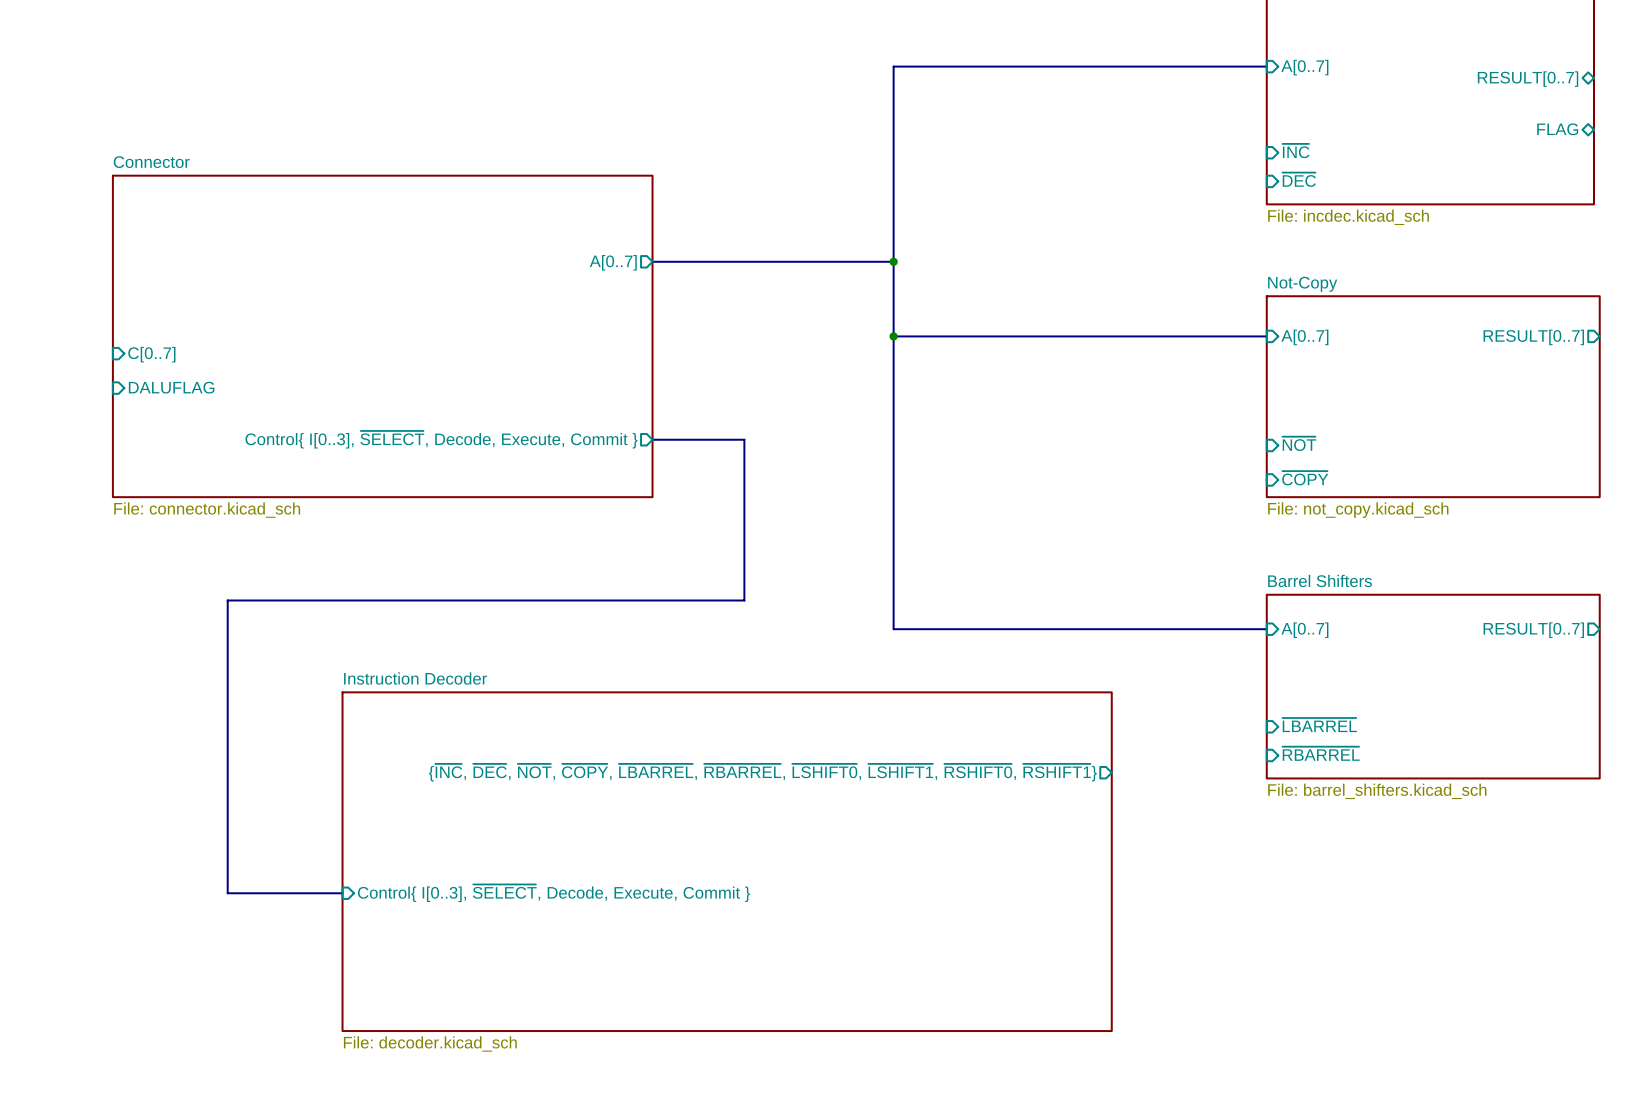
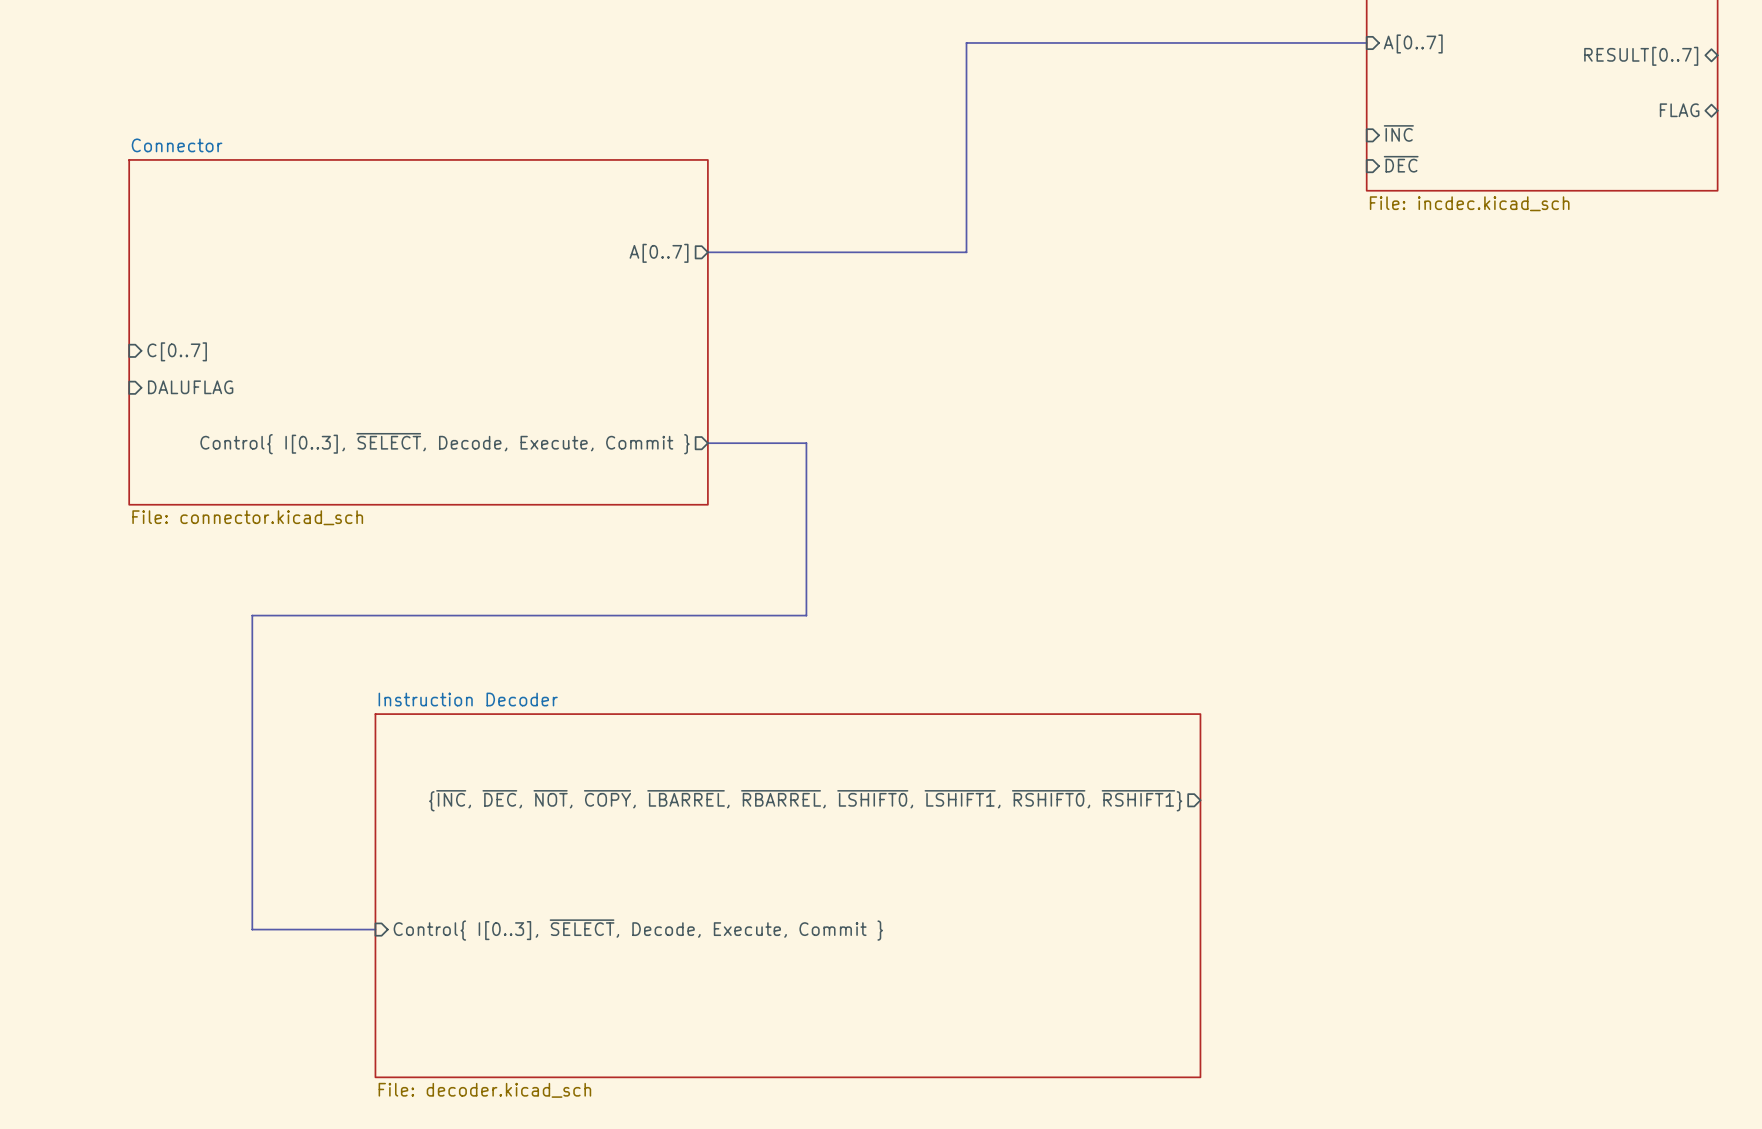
bus: (893, 261) (893, 629) (1266, 629) -> none
junction: (893, 261) -> none
bus: (893, 336) (1266, 336) -> none
junction: (893, 336) -> none
sheet pin: A[0..7] (1304, 337) -> none
sheet pin: RESULT[0..7] (1533, 337) -> none
sheet Not-Copy: File: not_copy.kicad_sch (1433, 396) -> none
sheet pin: ~{NOT} (1299, 443) -> none
sheet pin: ~{COPY} (1305, 478) -> none
sheet pin: A[0..7] (1304, 630) -> none
sheet pin: RESULT[0..7] (1533, 630) -> none
sheet Barrel Shifters: File: barrel_shifters.kicad_sch (1433, 686) -> none
sheet pin: ~{LBARREL} (1319, 725) -> none
sheet pin: ~{RBARREL} (1321, 753) -> none

